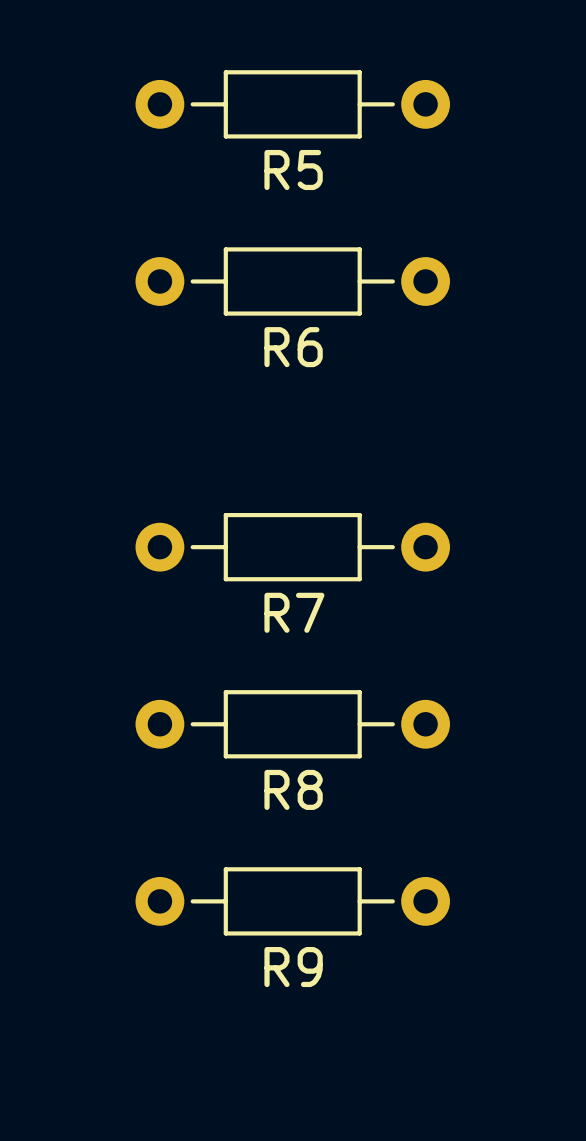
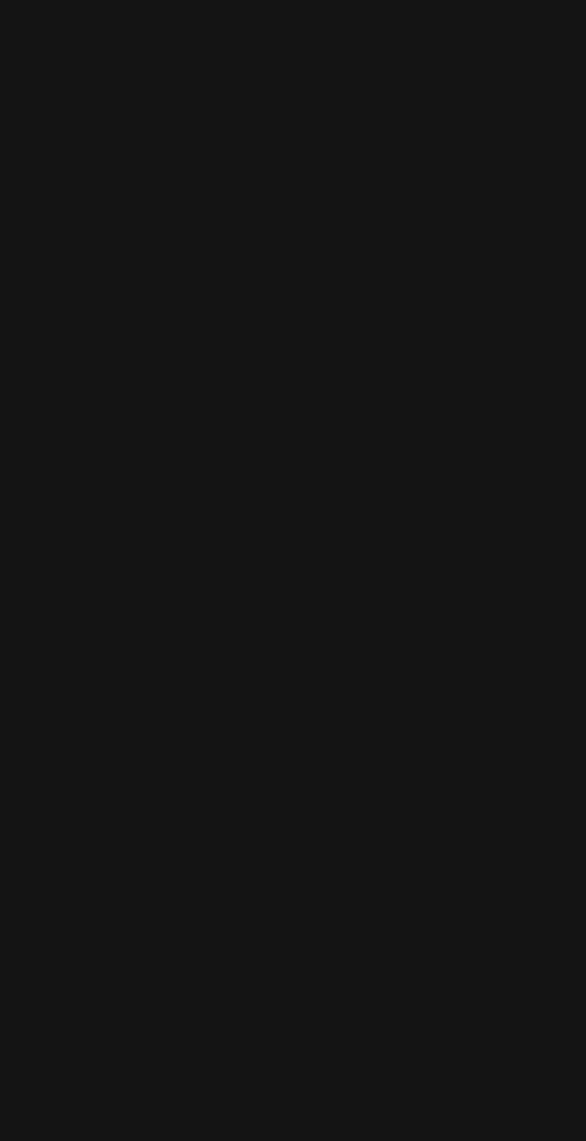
R5: (292, 104) -> none
R6: (292, 281) -> none
R7: (292, 547) -> none
R8: (292, 724) -> none
R9: (292, 901) -> none

